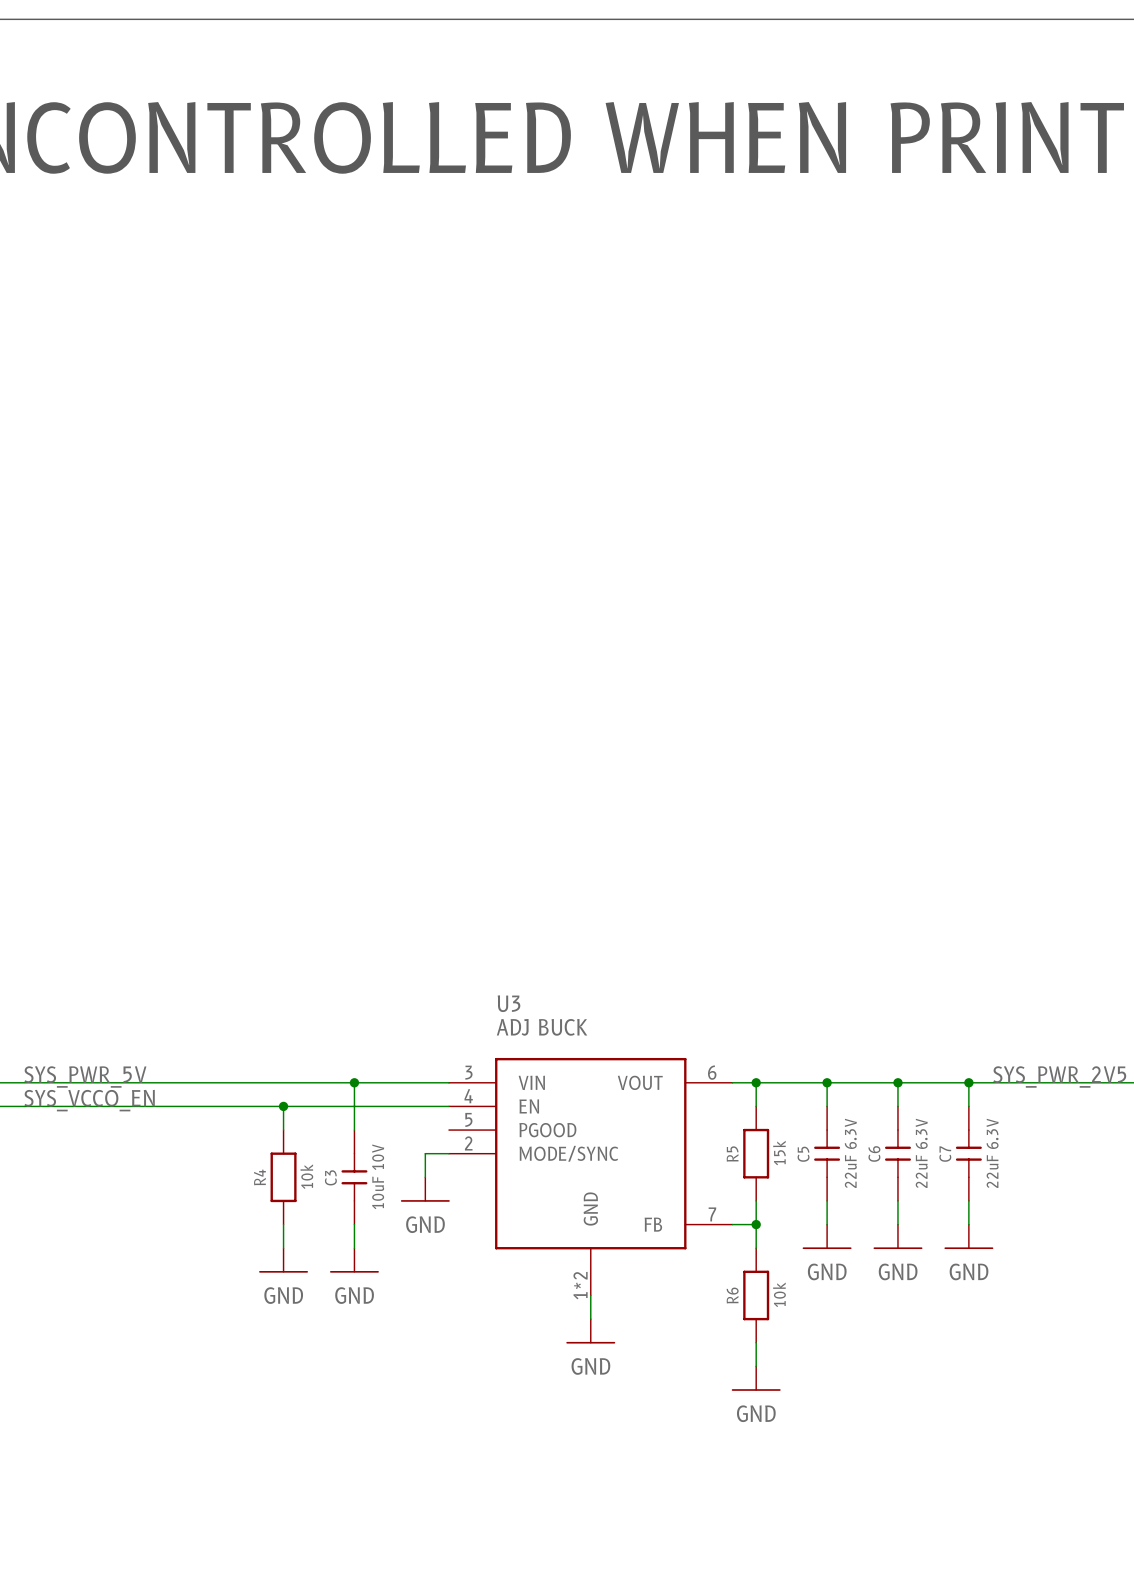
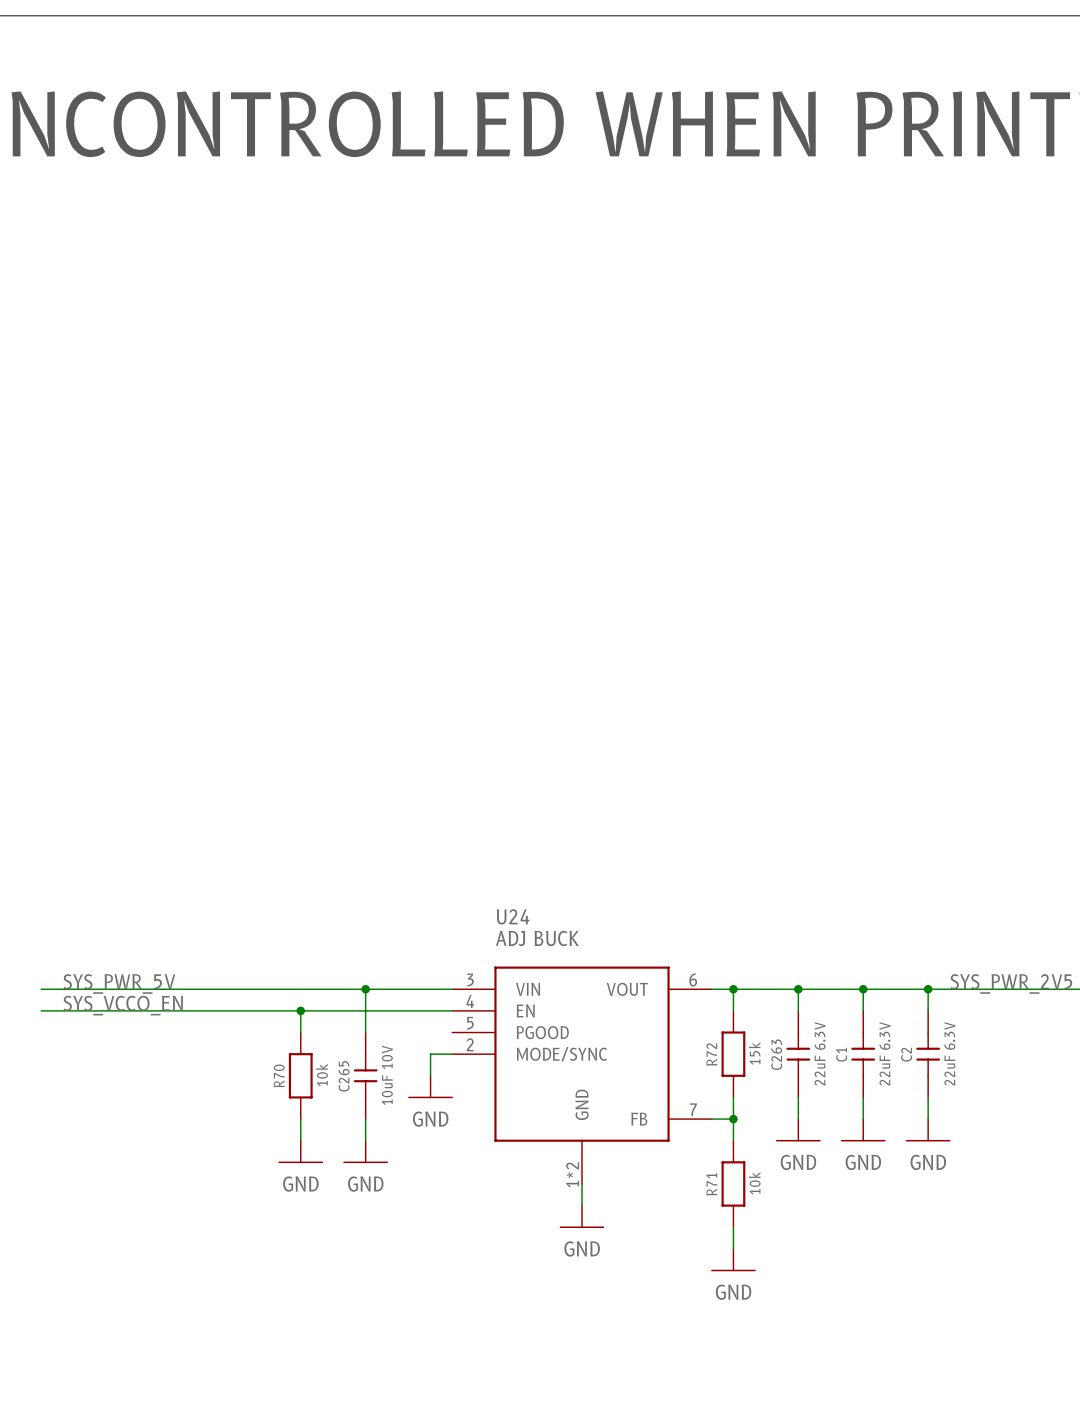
U3 name: U3 (509, 1003) -> U24 (513, 916)
C6 name: C6 (874, 1153) -> C1 (841, 1054)
R5 name: R5 (732, 1154) -> R72 (711, 1054)
C5 name: C5 (803, 1154) -> C263 (776, 1054)
C7 name: C7 (945, 1154) -> C2 (906, 1054)
R4 name: R4 (259, 1177) -> R70 (279, 1075)
C3 name: C3 (330, 1177) -> C265 (344, 1076)
R6 name: R6 (732, 1295) -> R71 (711, 1184)

